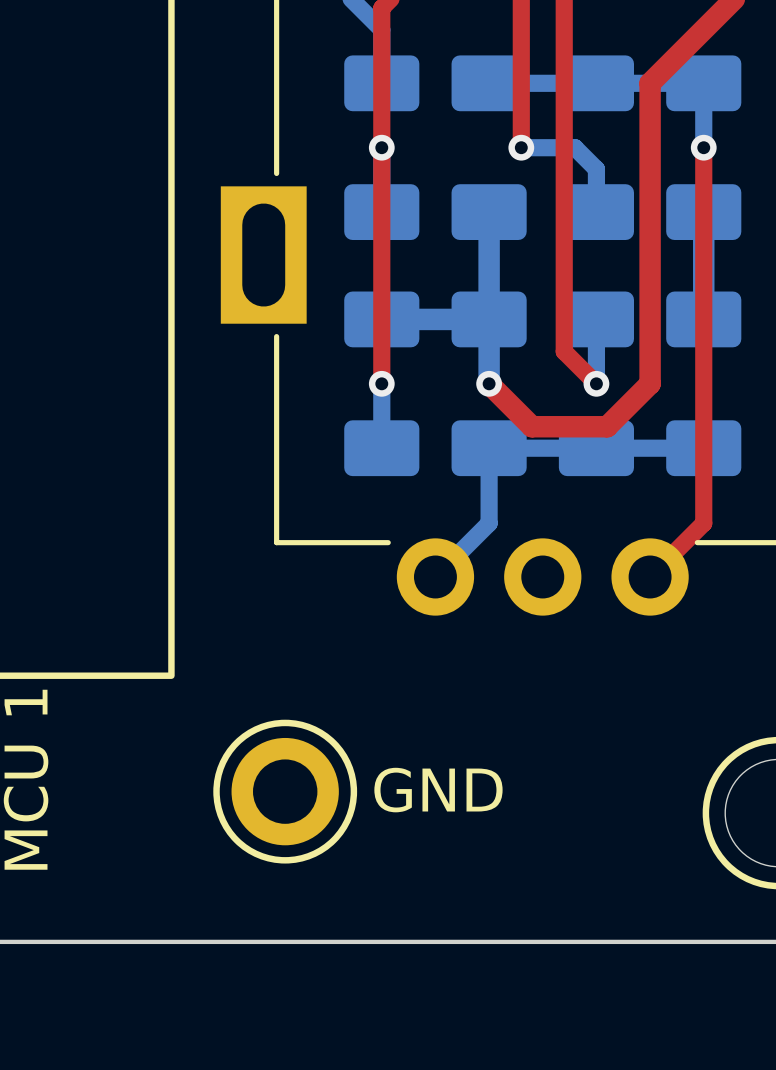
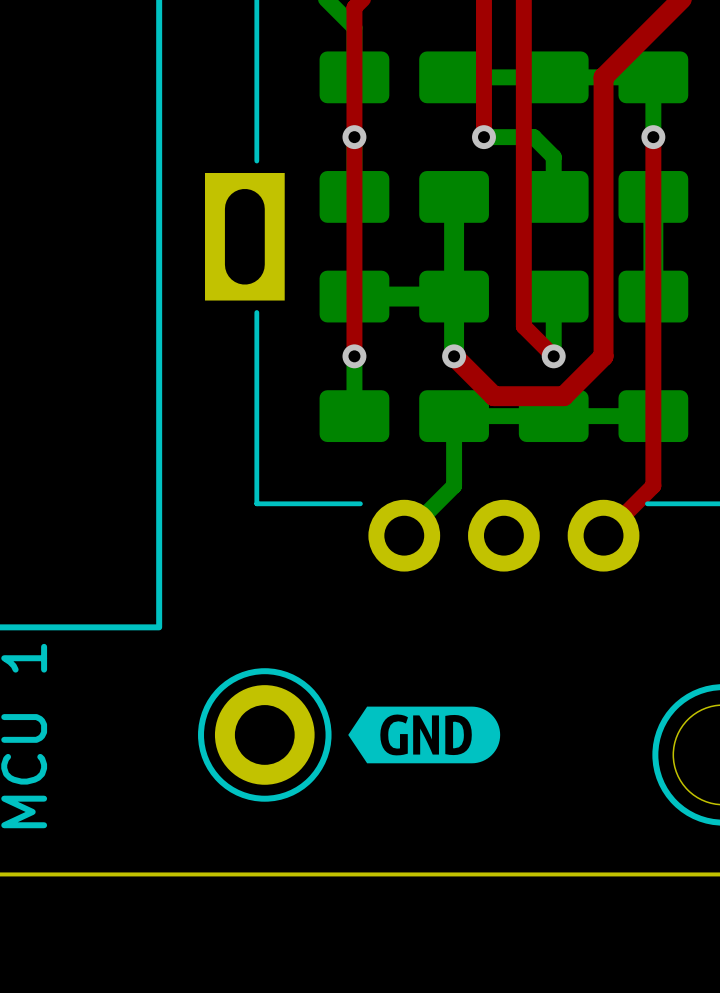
drawing: none -> [348, 706, 501, 764]
text: GND (438, 790) -> none

